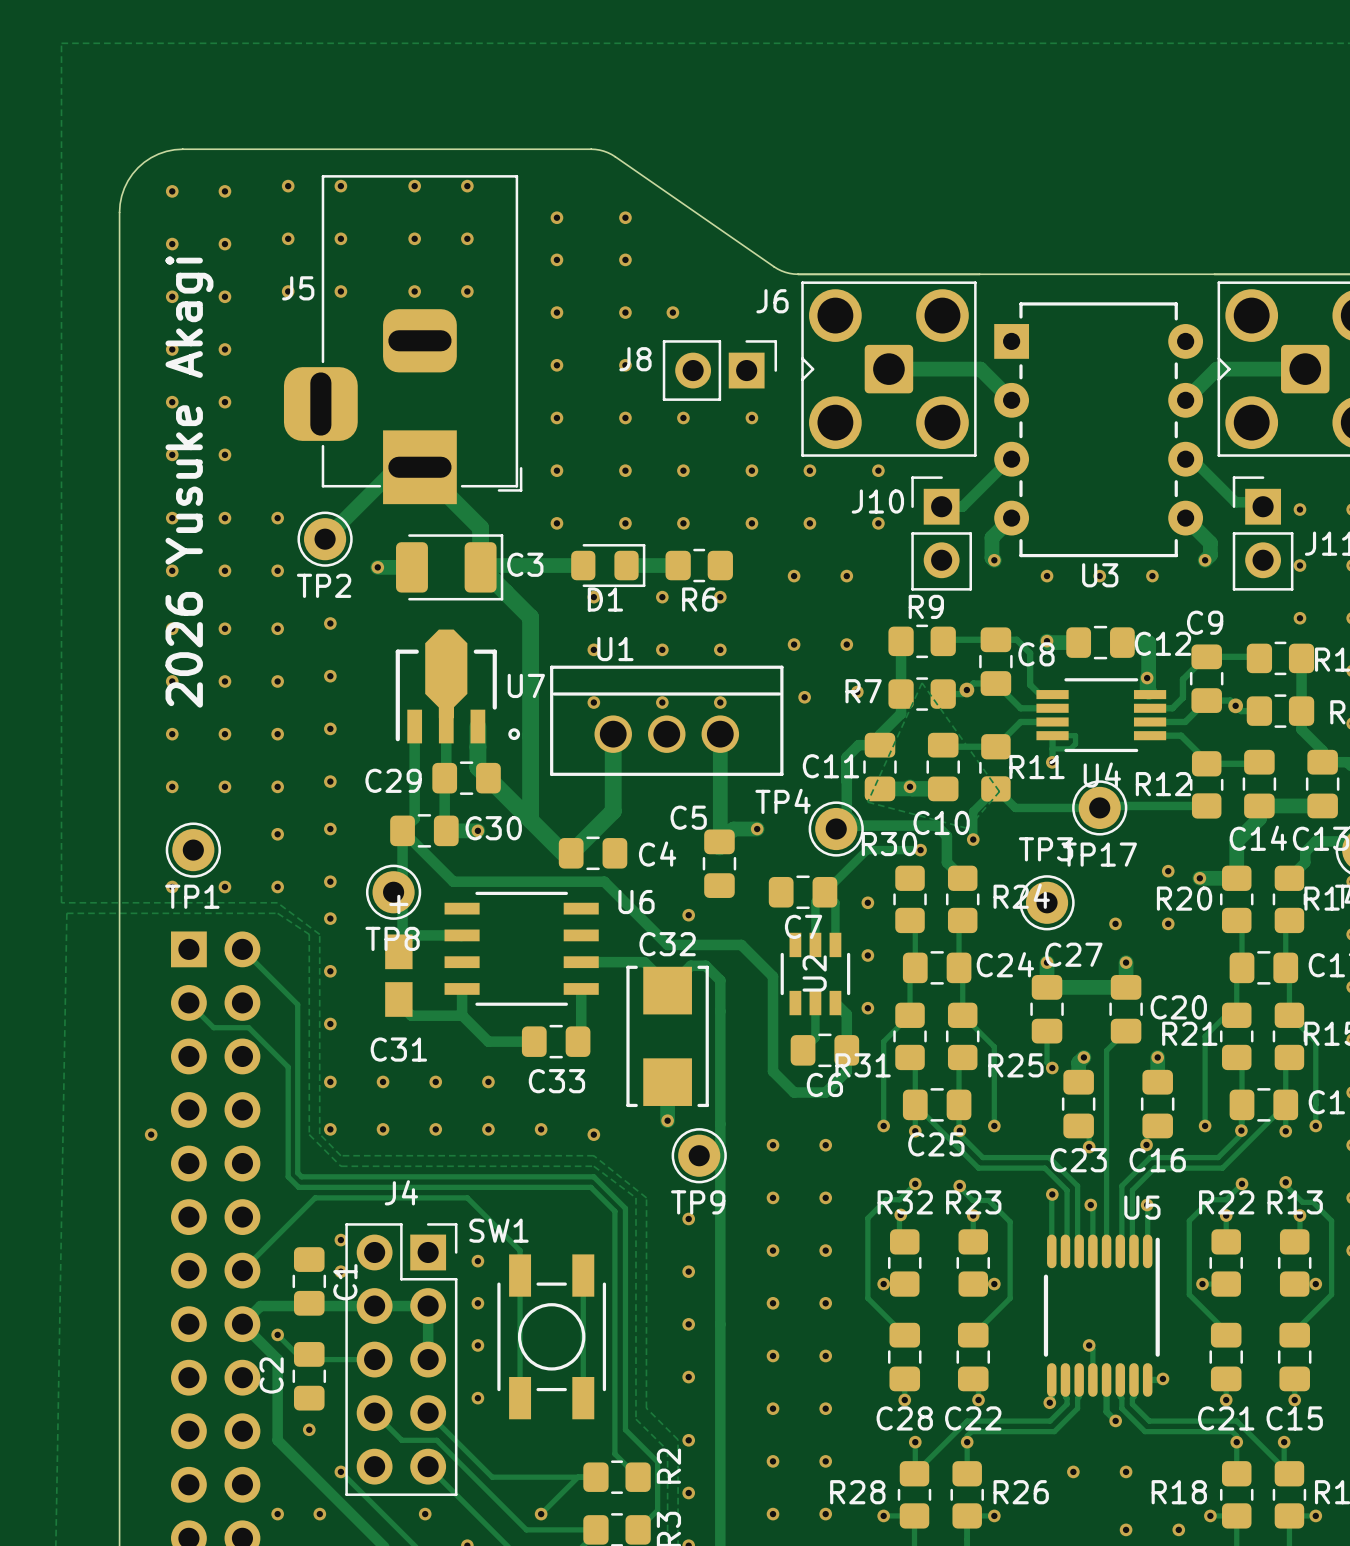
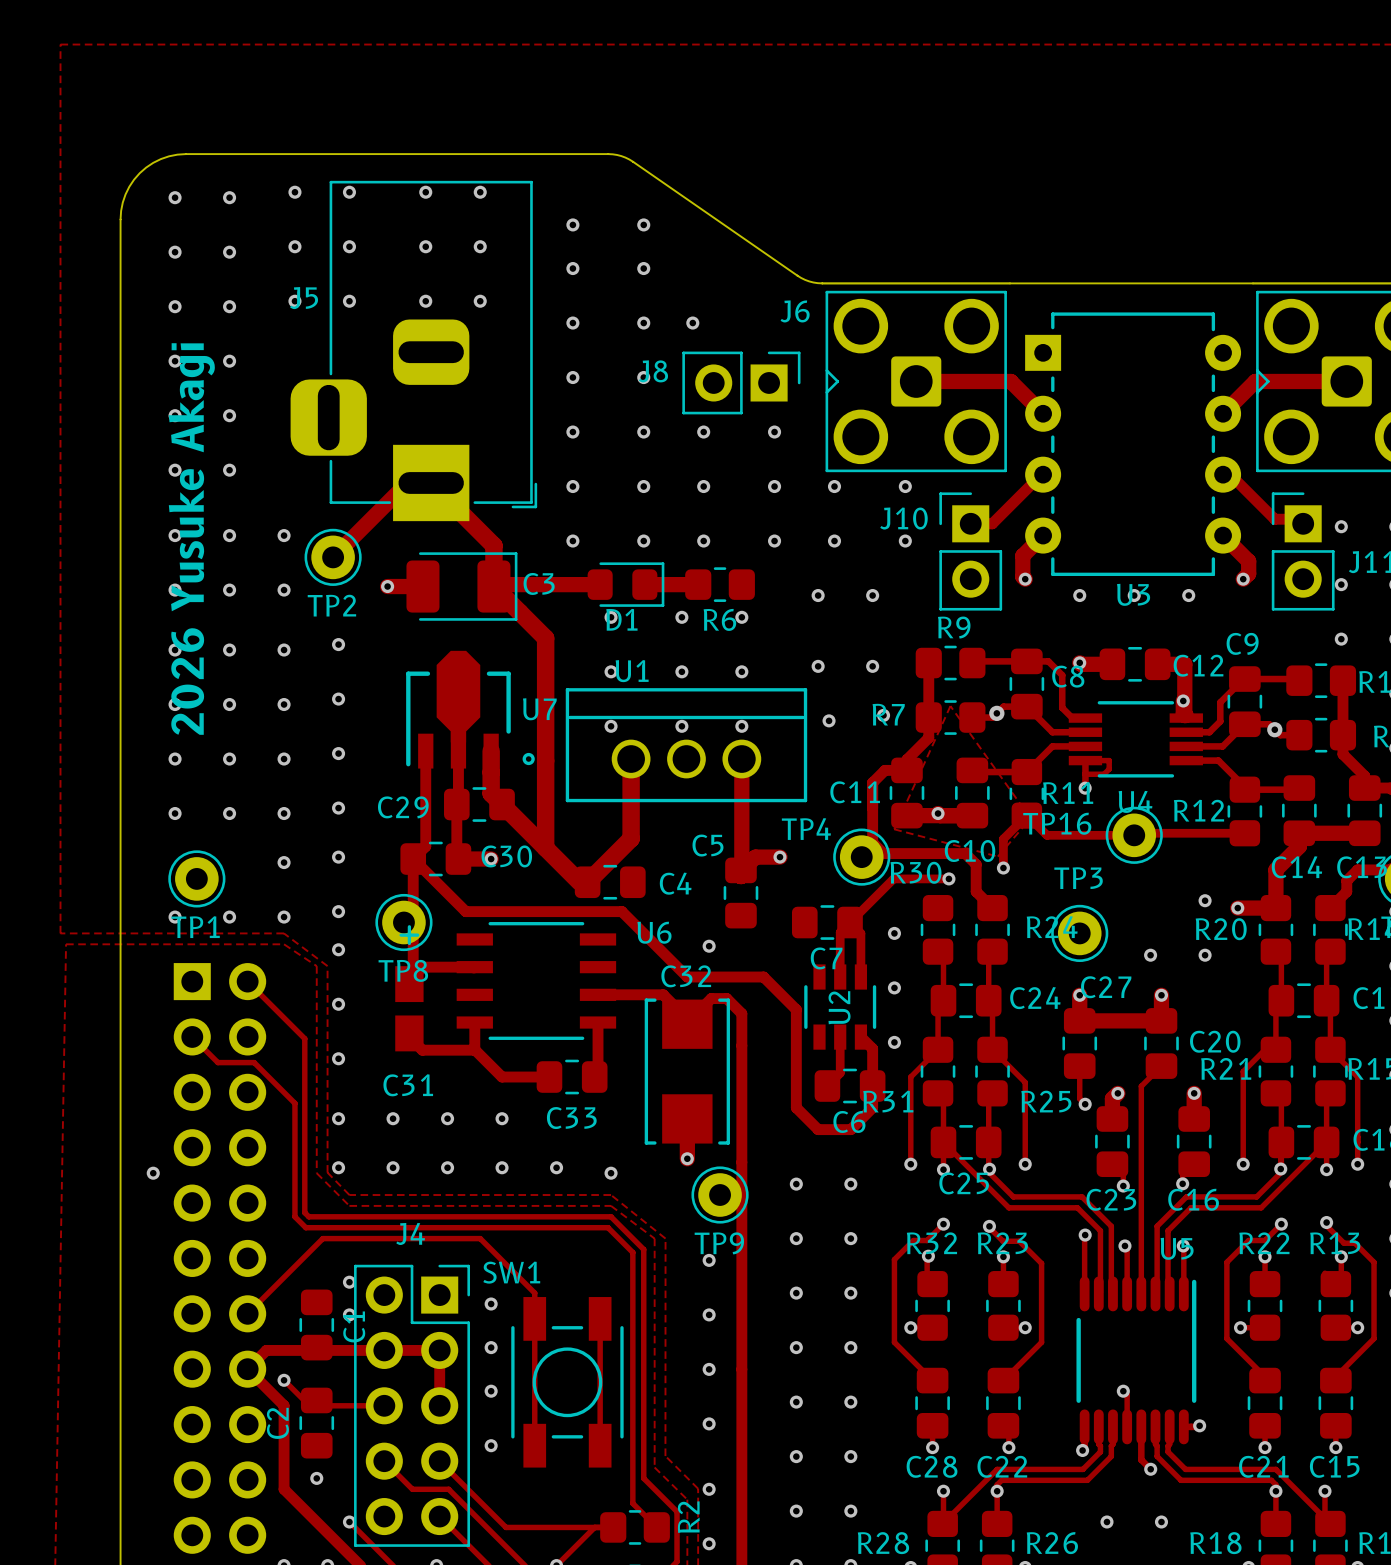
TP17 name: TP17 (1099, 854) -> TP16 (1057, 823)

